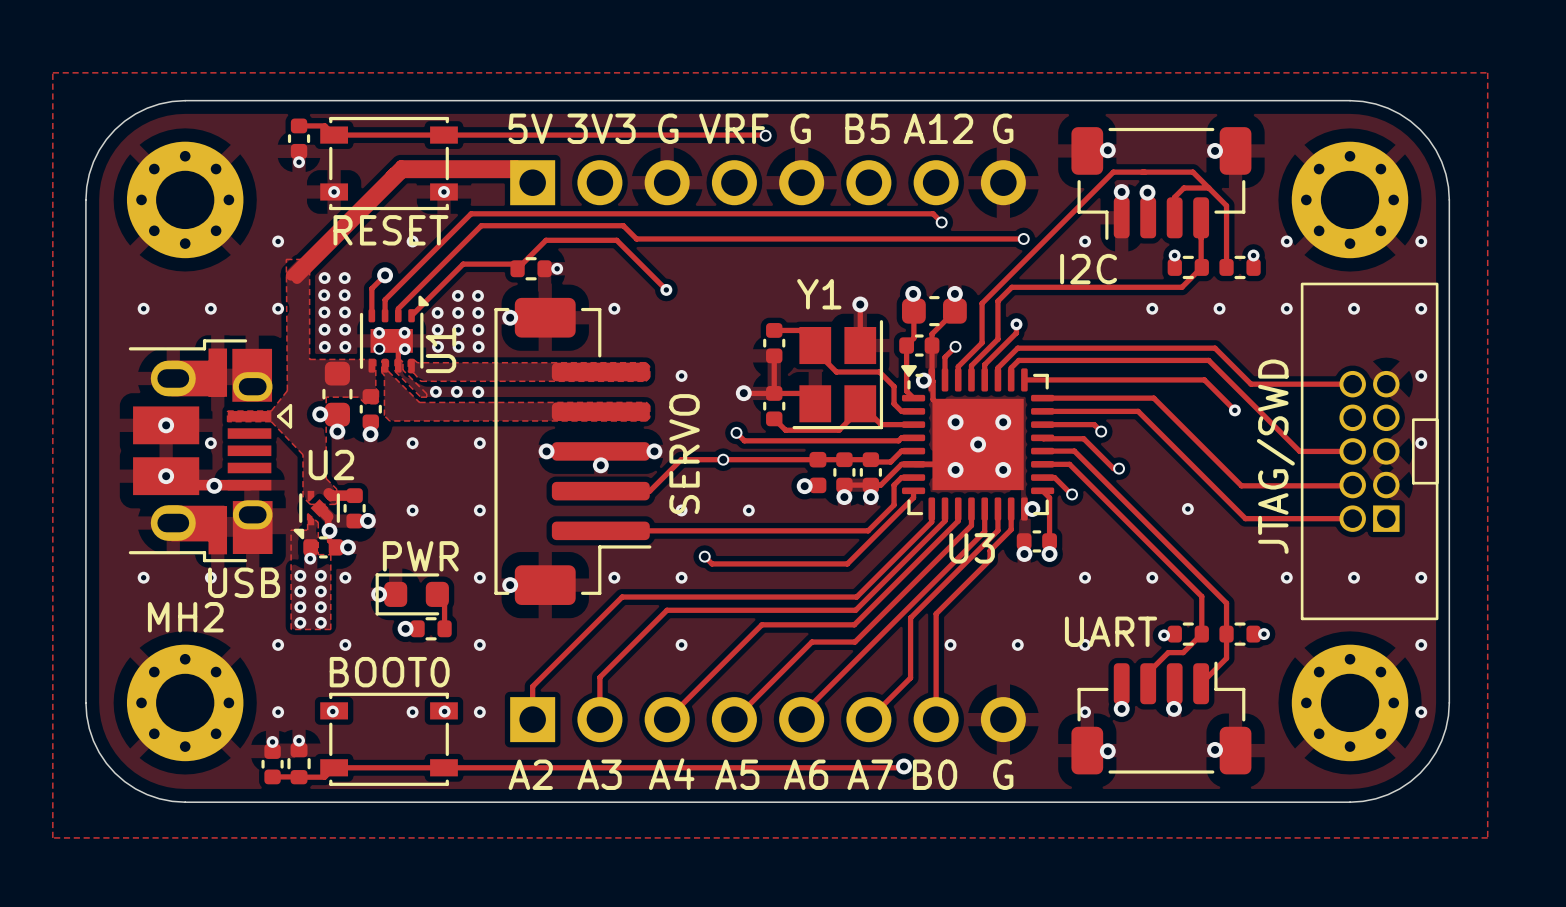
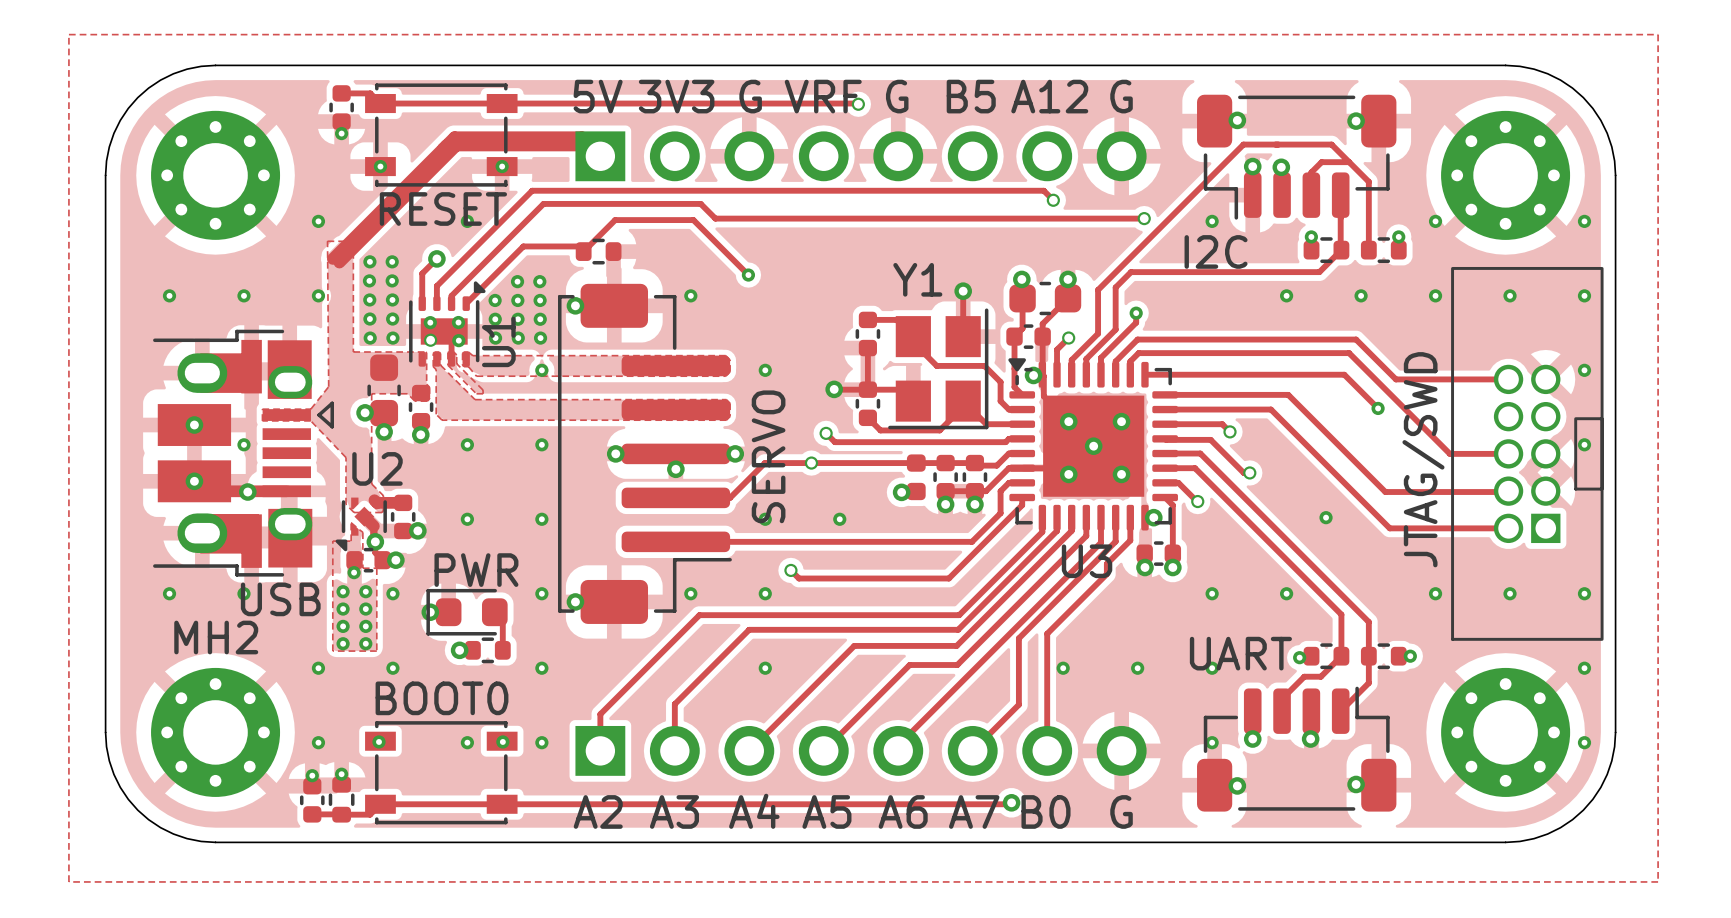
via: (557, 268) -> none
via: none -> (541, 370)
via: (435, 391) -> none
via: (456, 391) -> none
via: (478, 392) -> none

